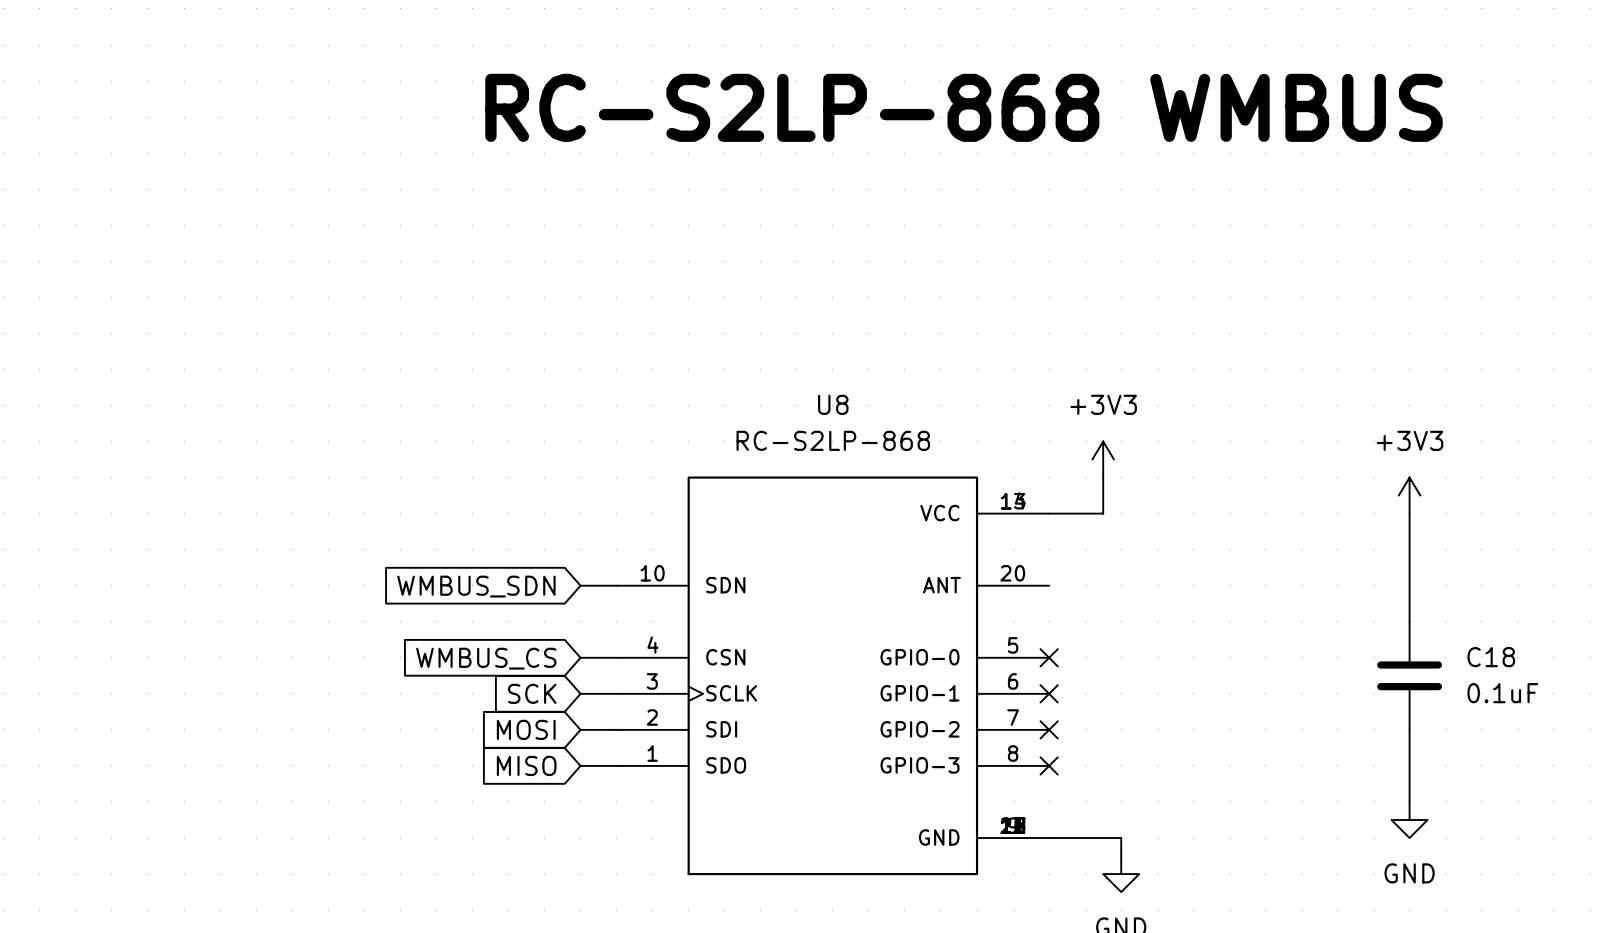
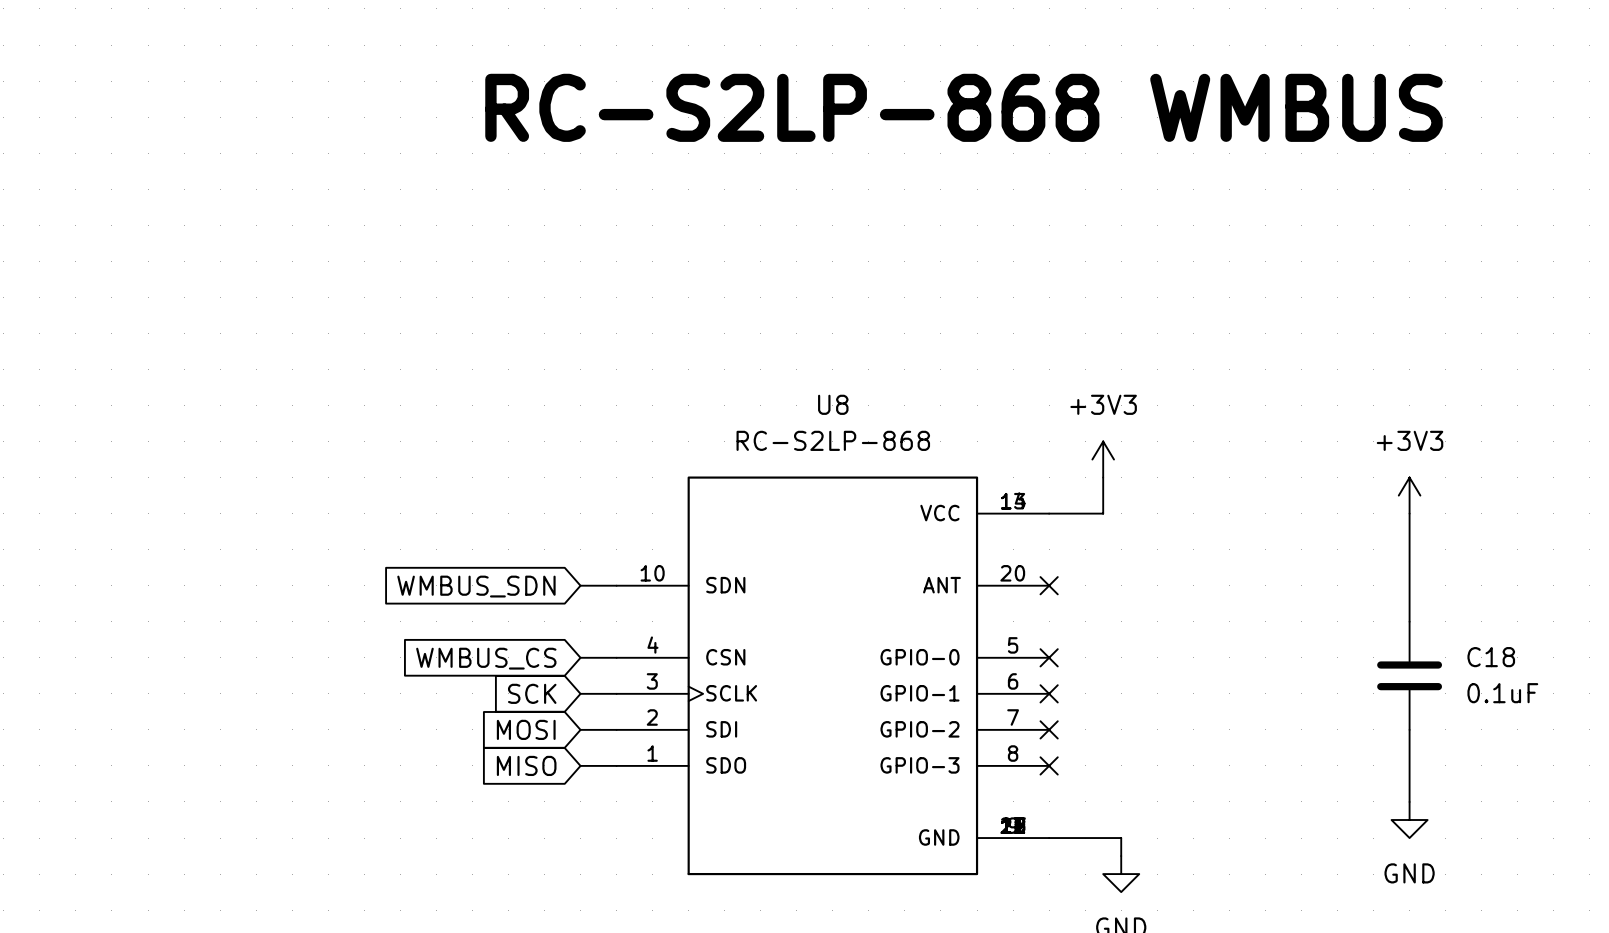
no-connect mark: none -> (1049, 585)

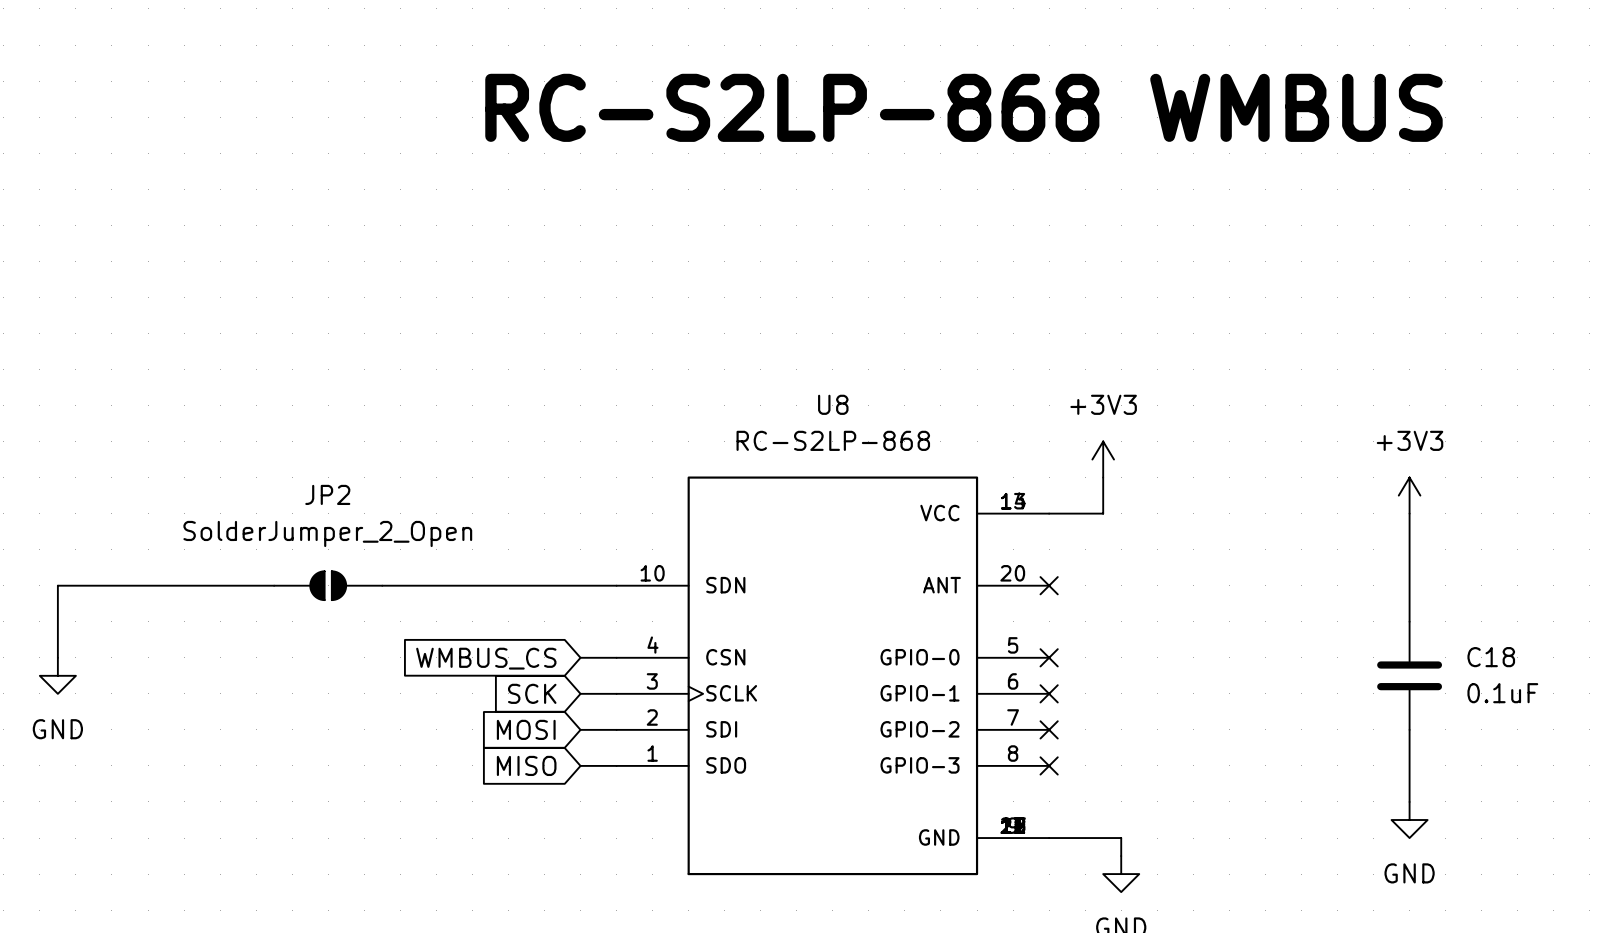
wire: none -> (274, 585) (57, 585) (57, 657)
JP2: none -> SolderJumper_2_Open (328, 585)
wire: none -> (382, 585) (580, 585)
global label: WMBUS_SDN (476, 586) -> none
power symbol: none -> GND (57, 675)

